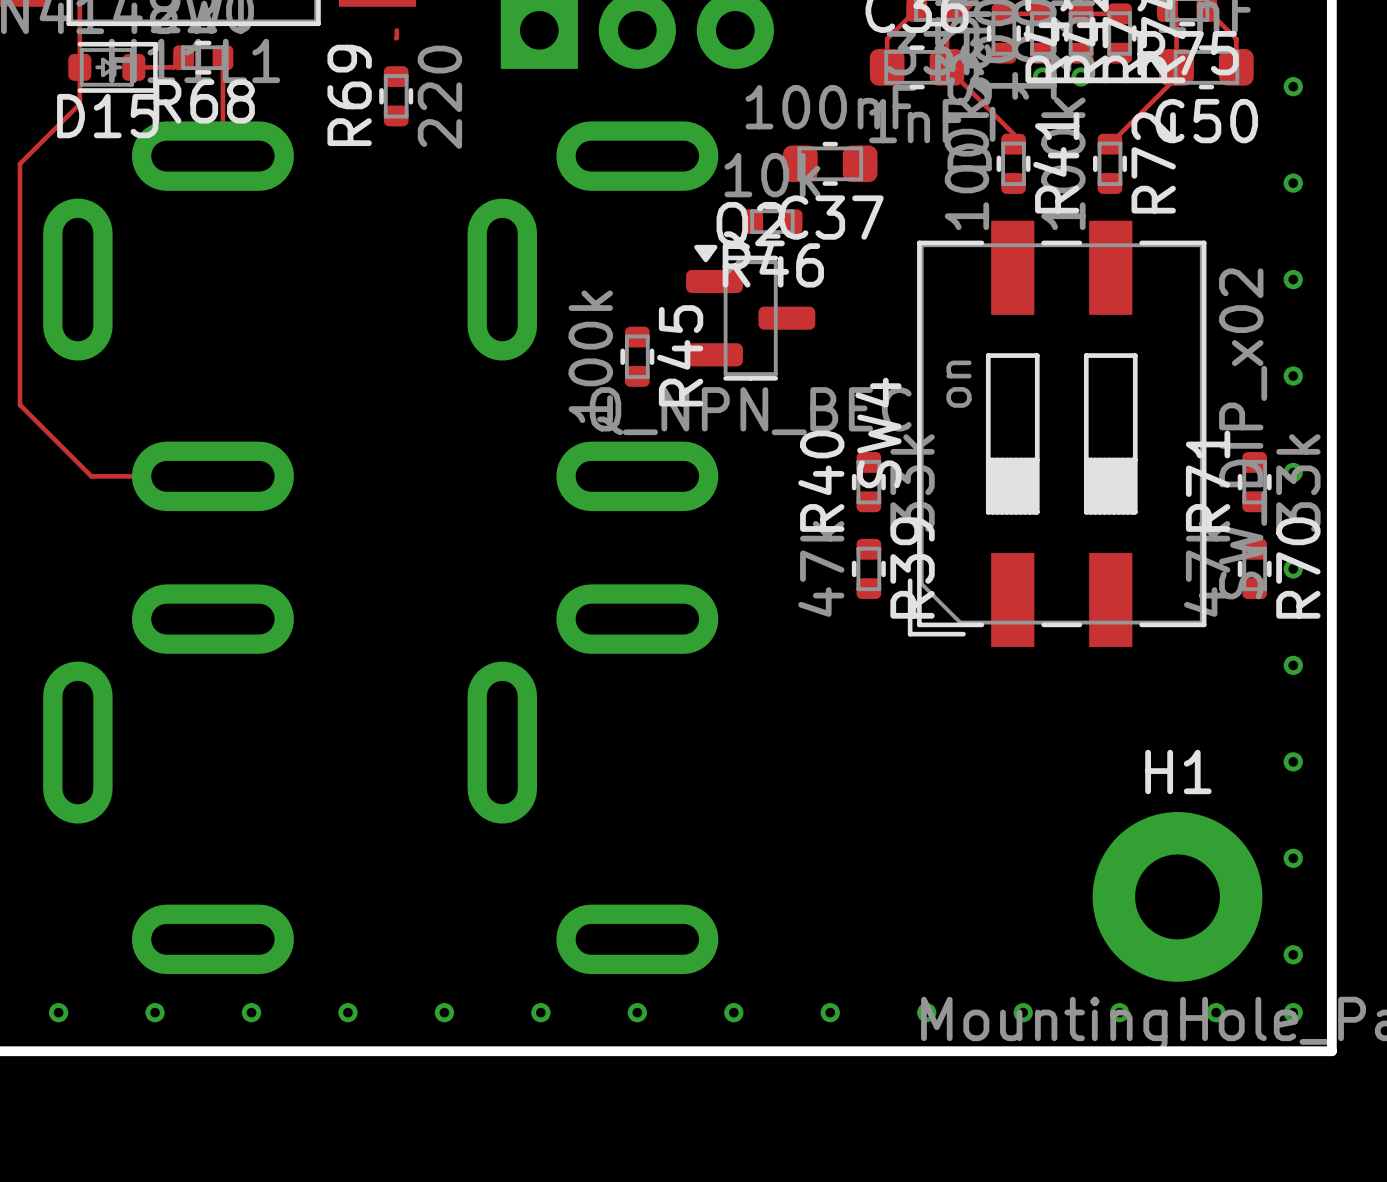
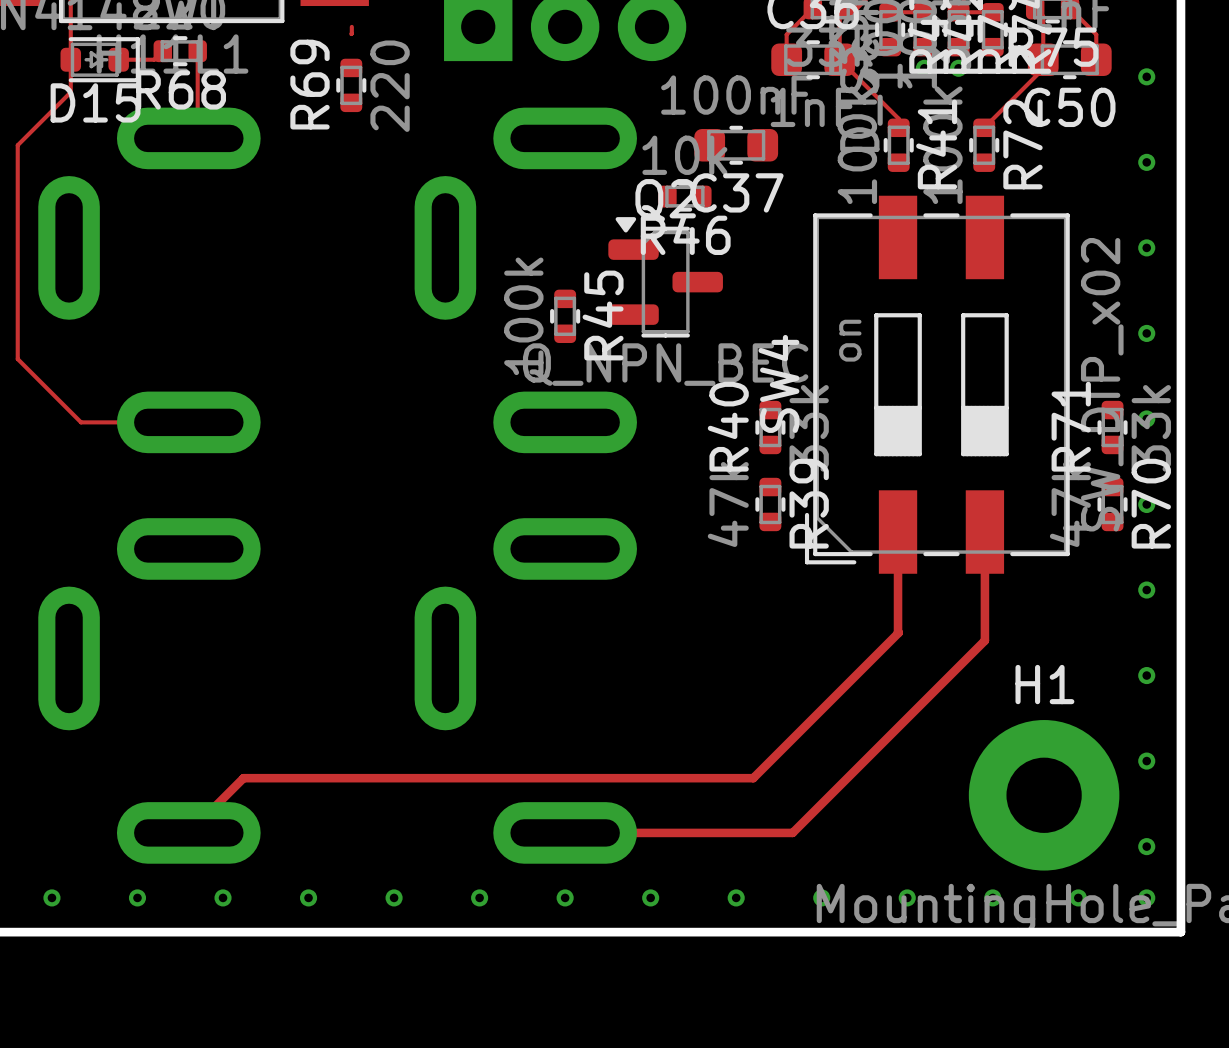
track: none -> (898, 532) (898, 632) (753, 778) (243, 778) (188, 832)
track: none -> (984, 532) (984, 640) (792, 832) (565, 832)

